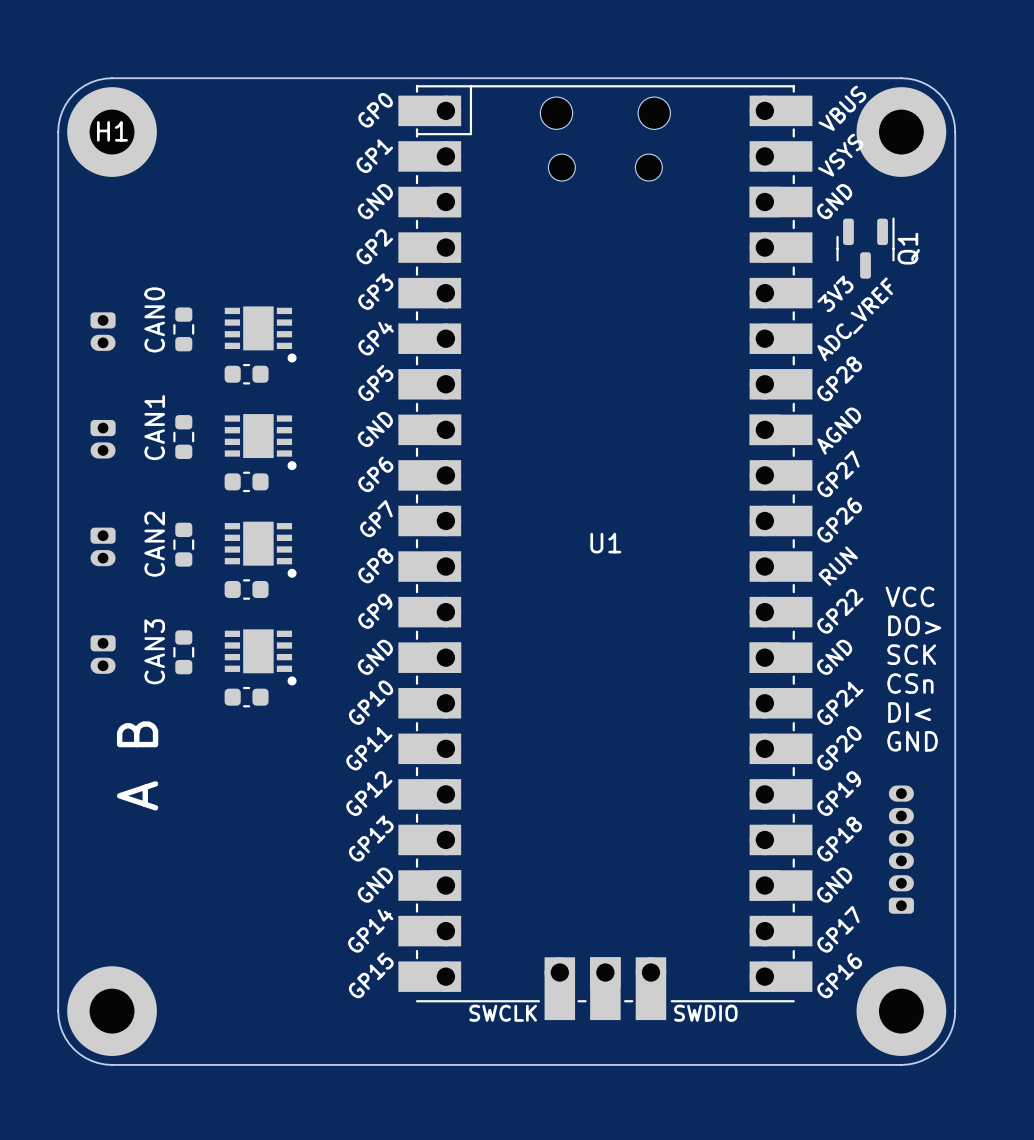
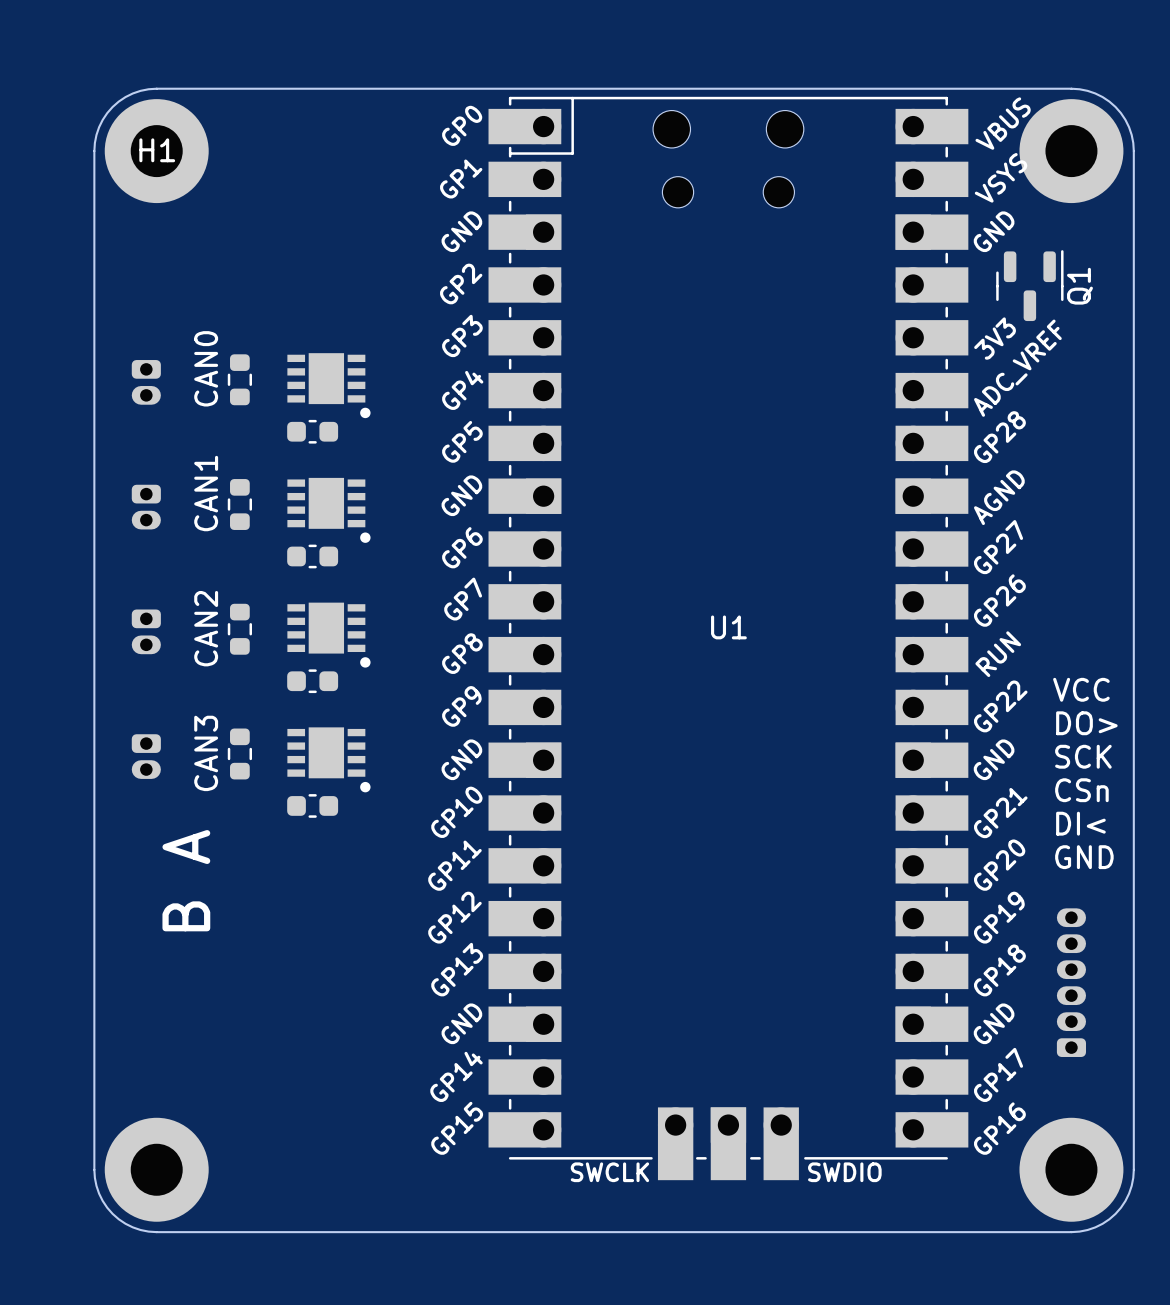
text: A B (137, 765) -> B A (186, 880)

